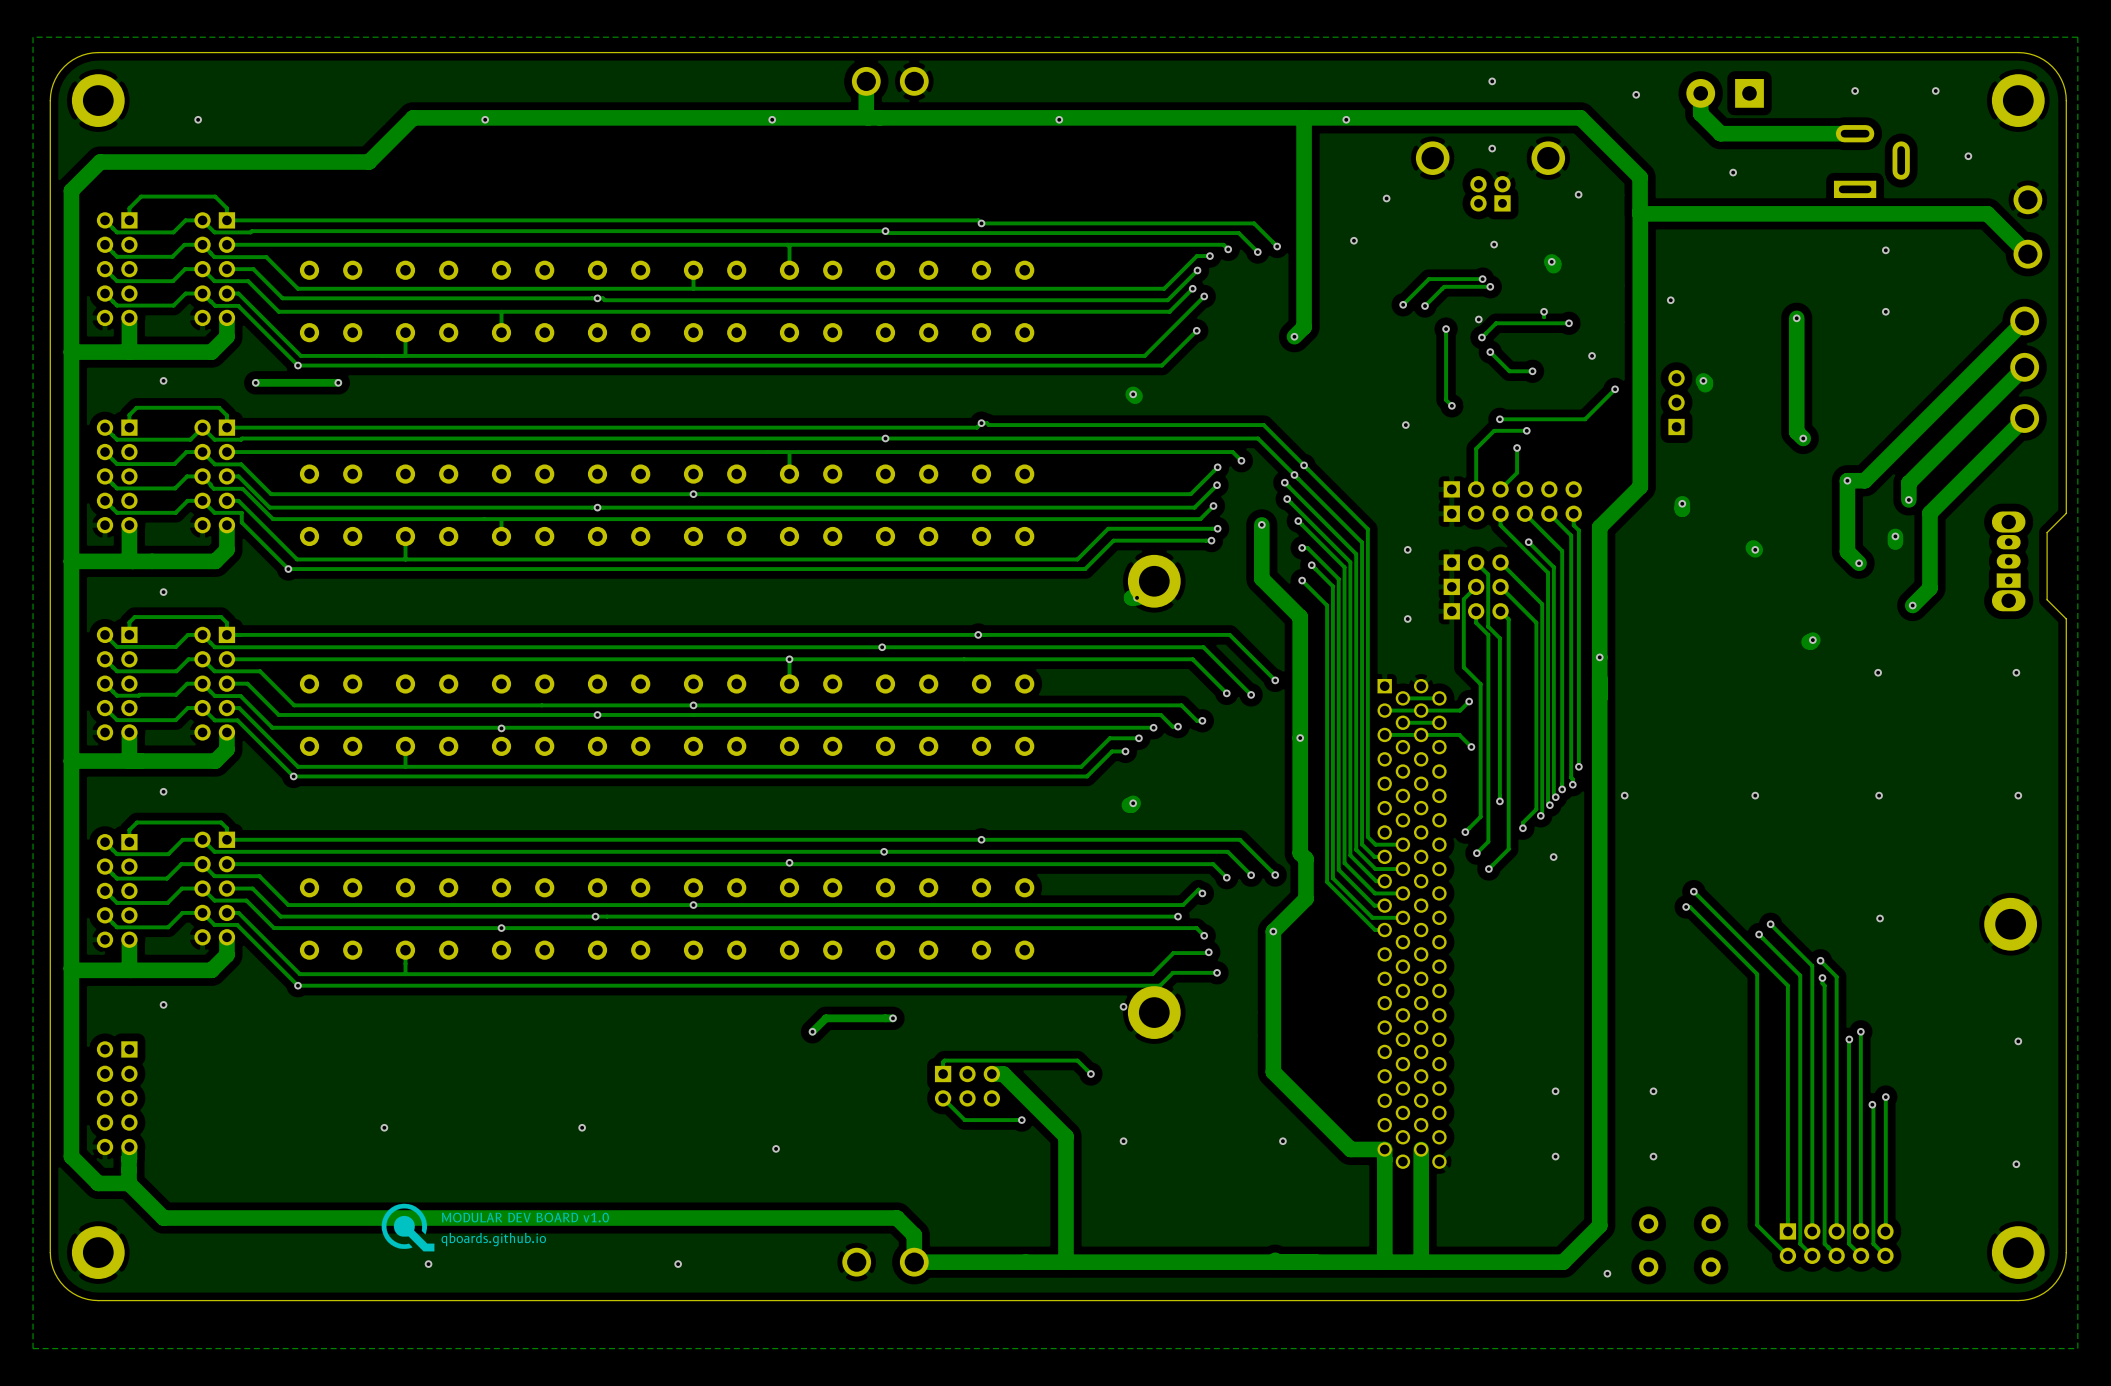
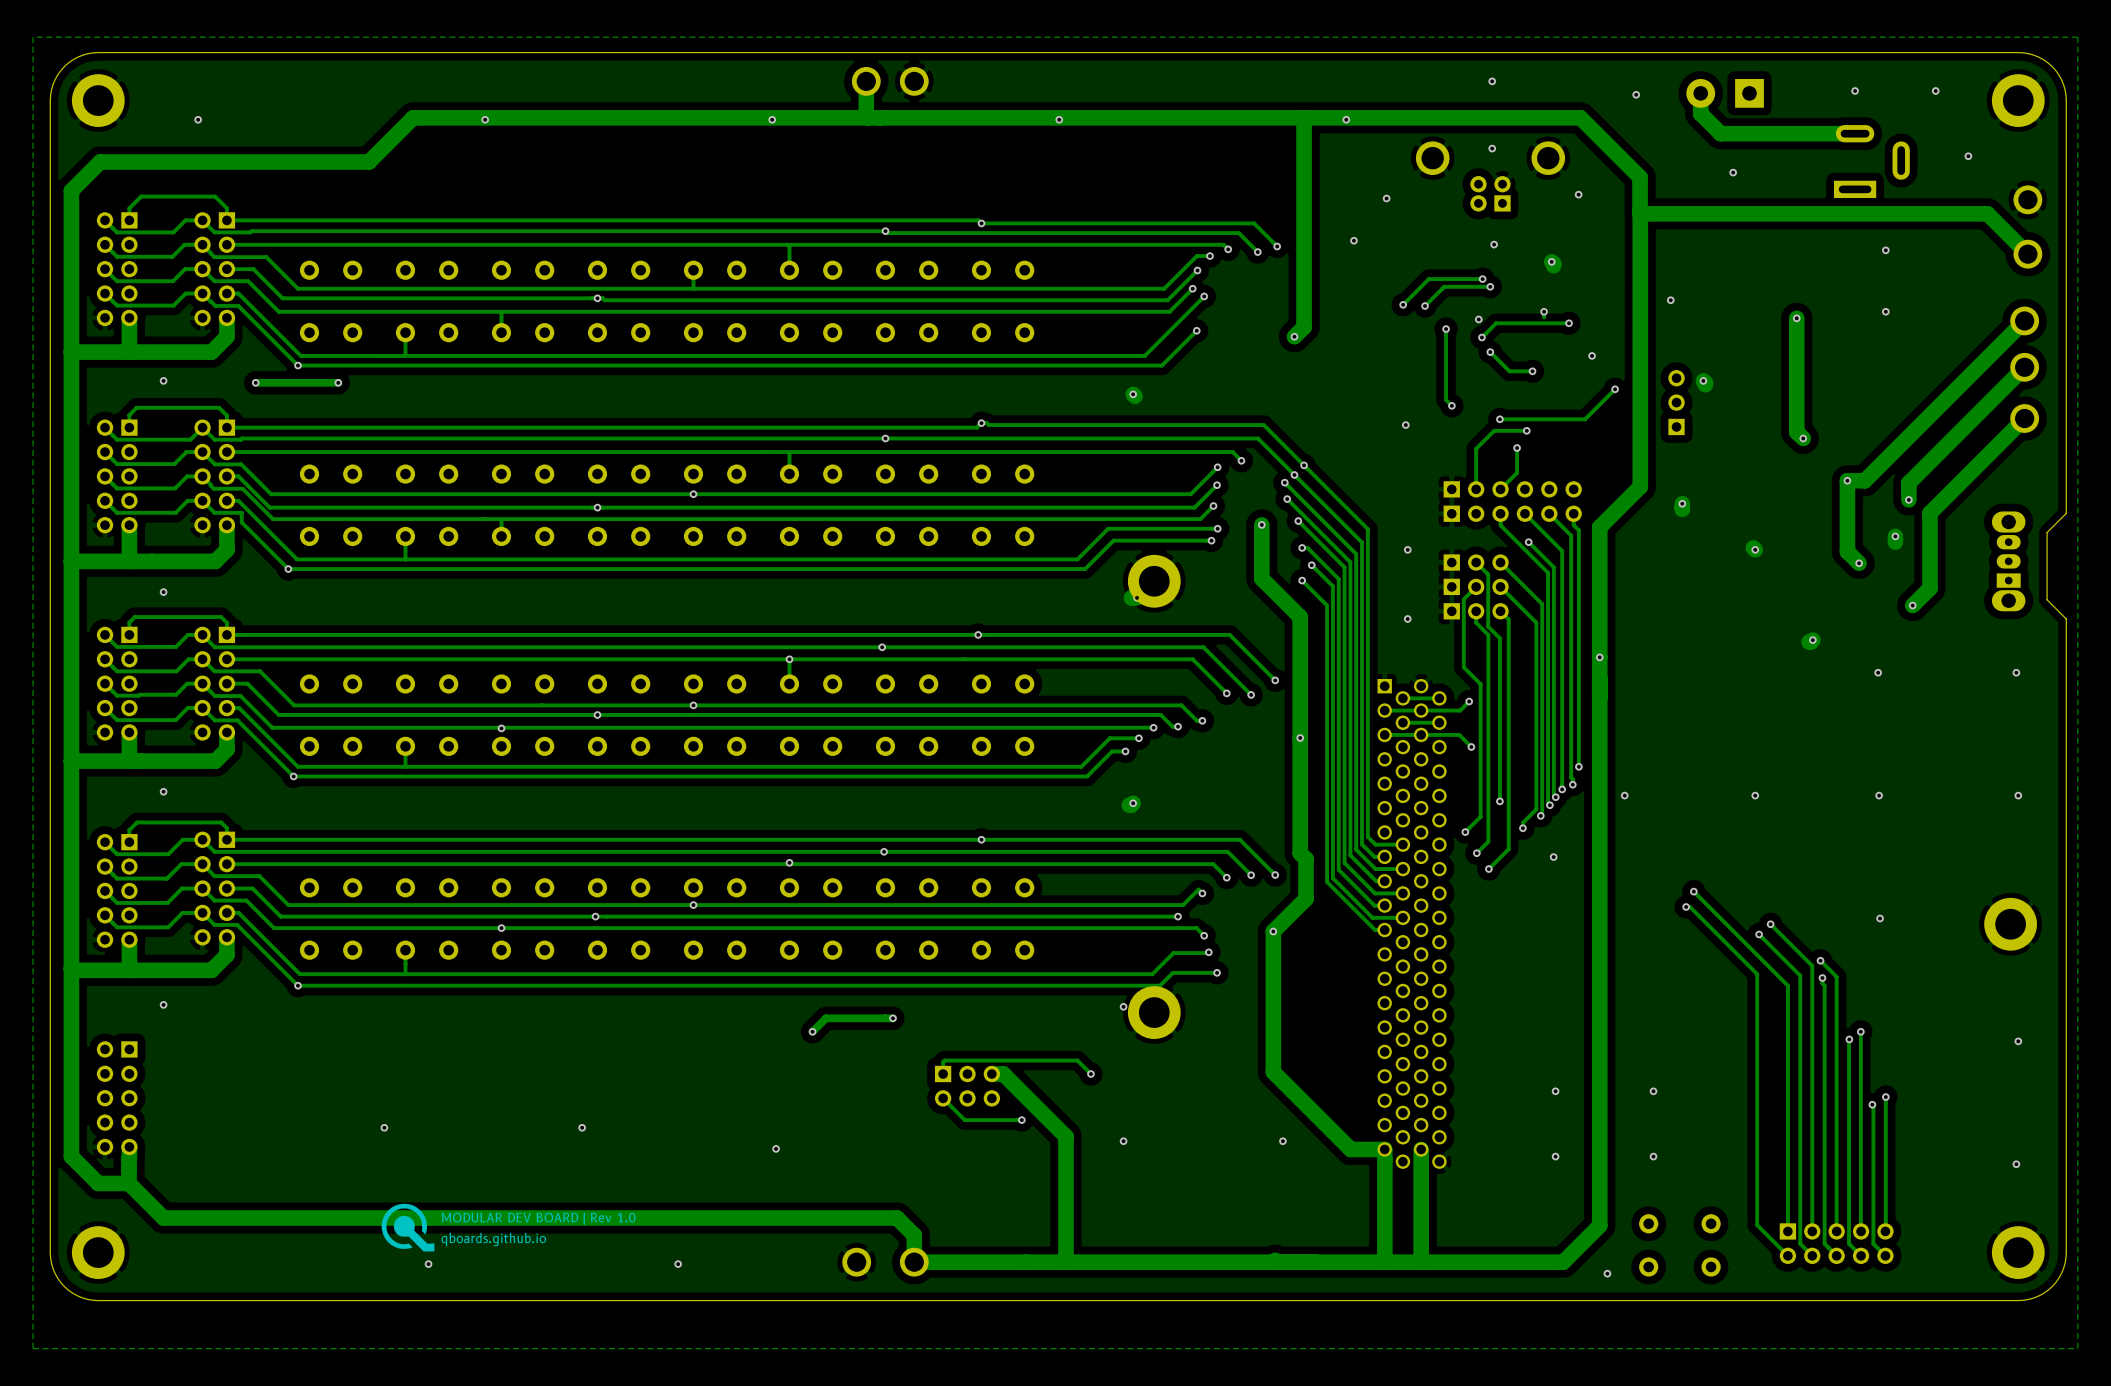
MODULAR DEV BOARD v1.0 name: MODULAR DEV BOARD v1.0 (525, 1217) -> MODULAR DEV BOARD | Rev 1.0 (538, 1218)

